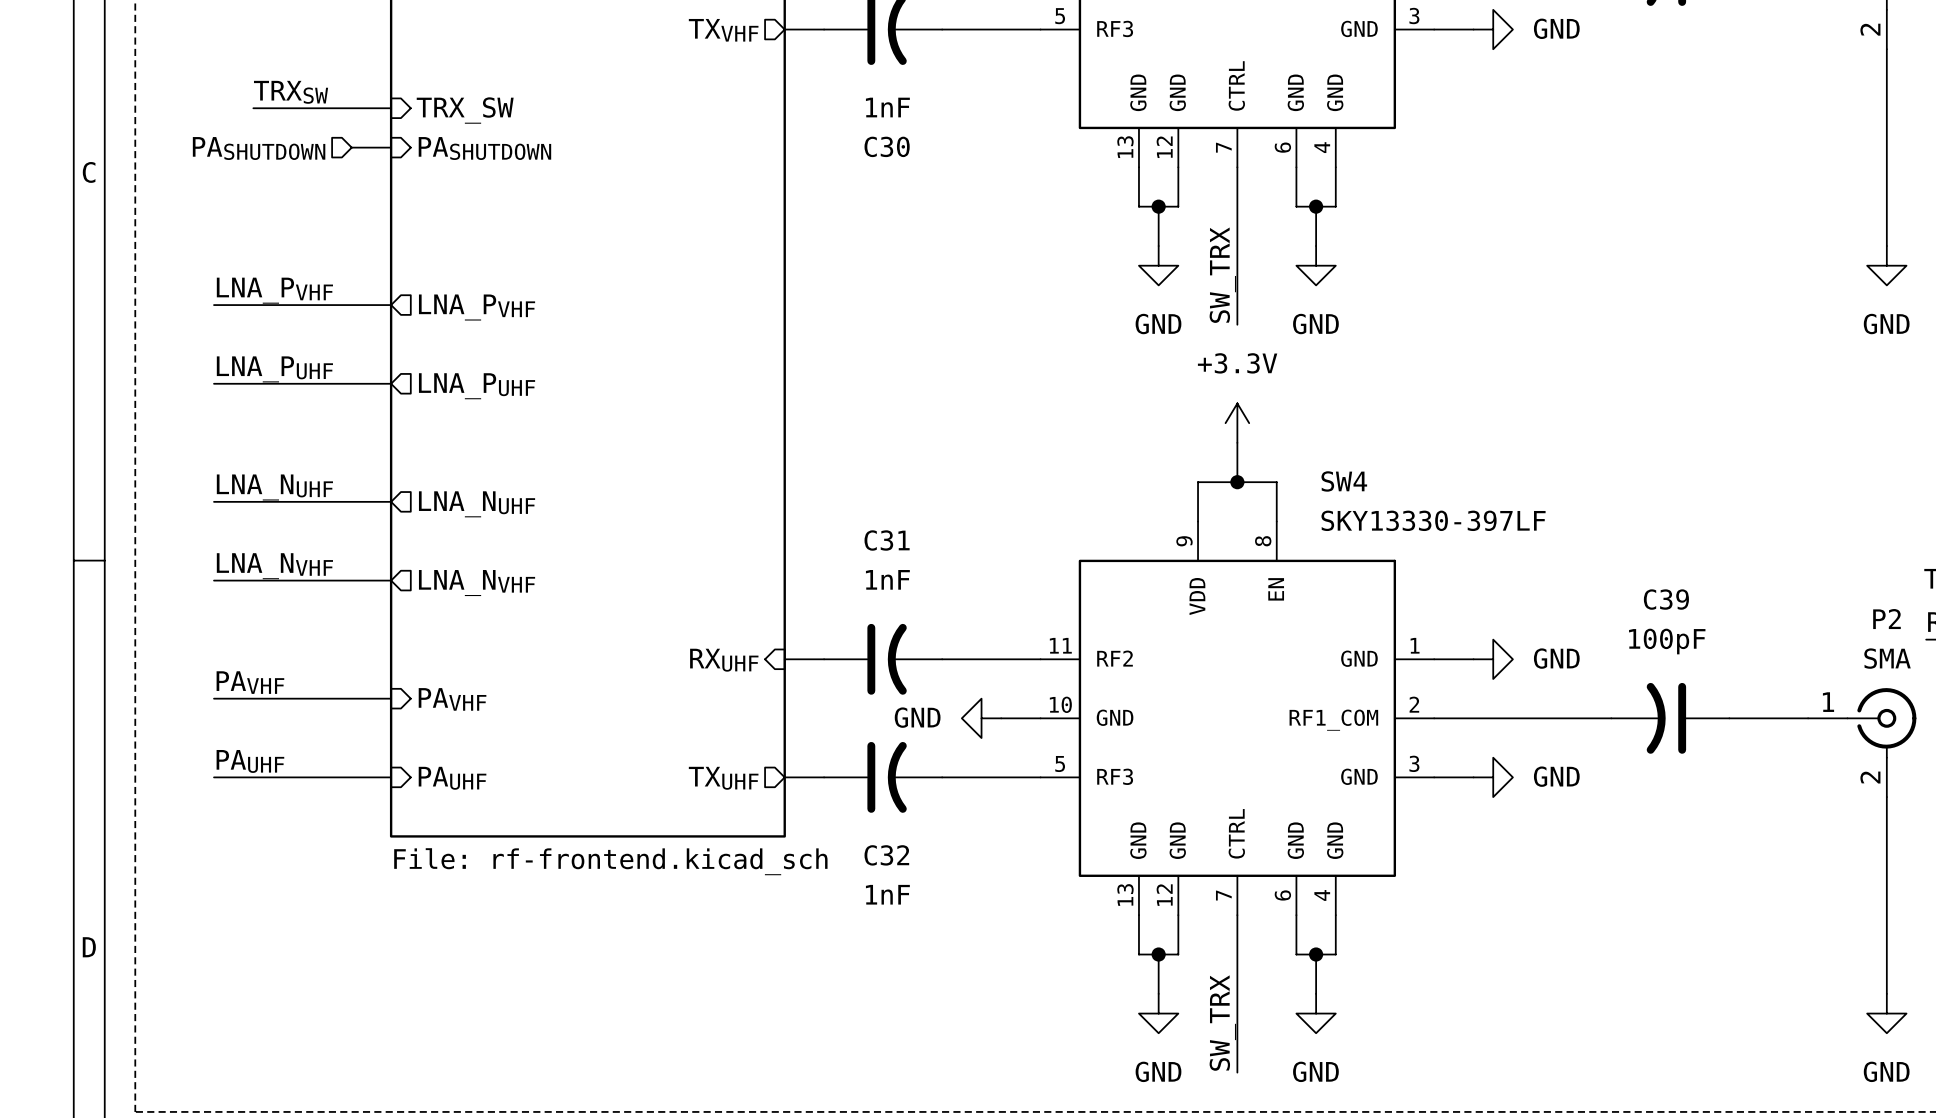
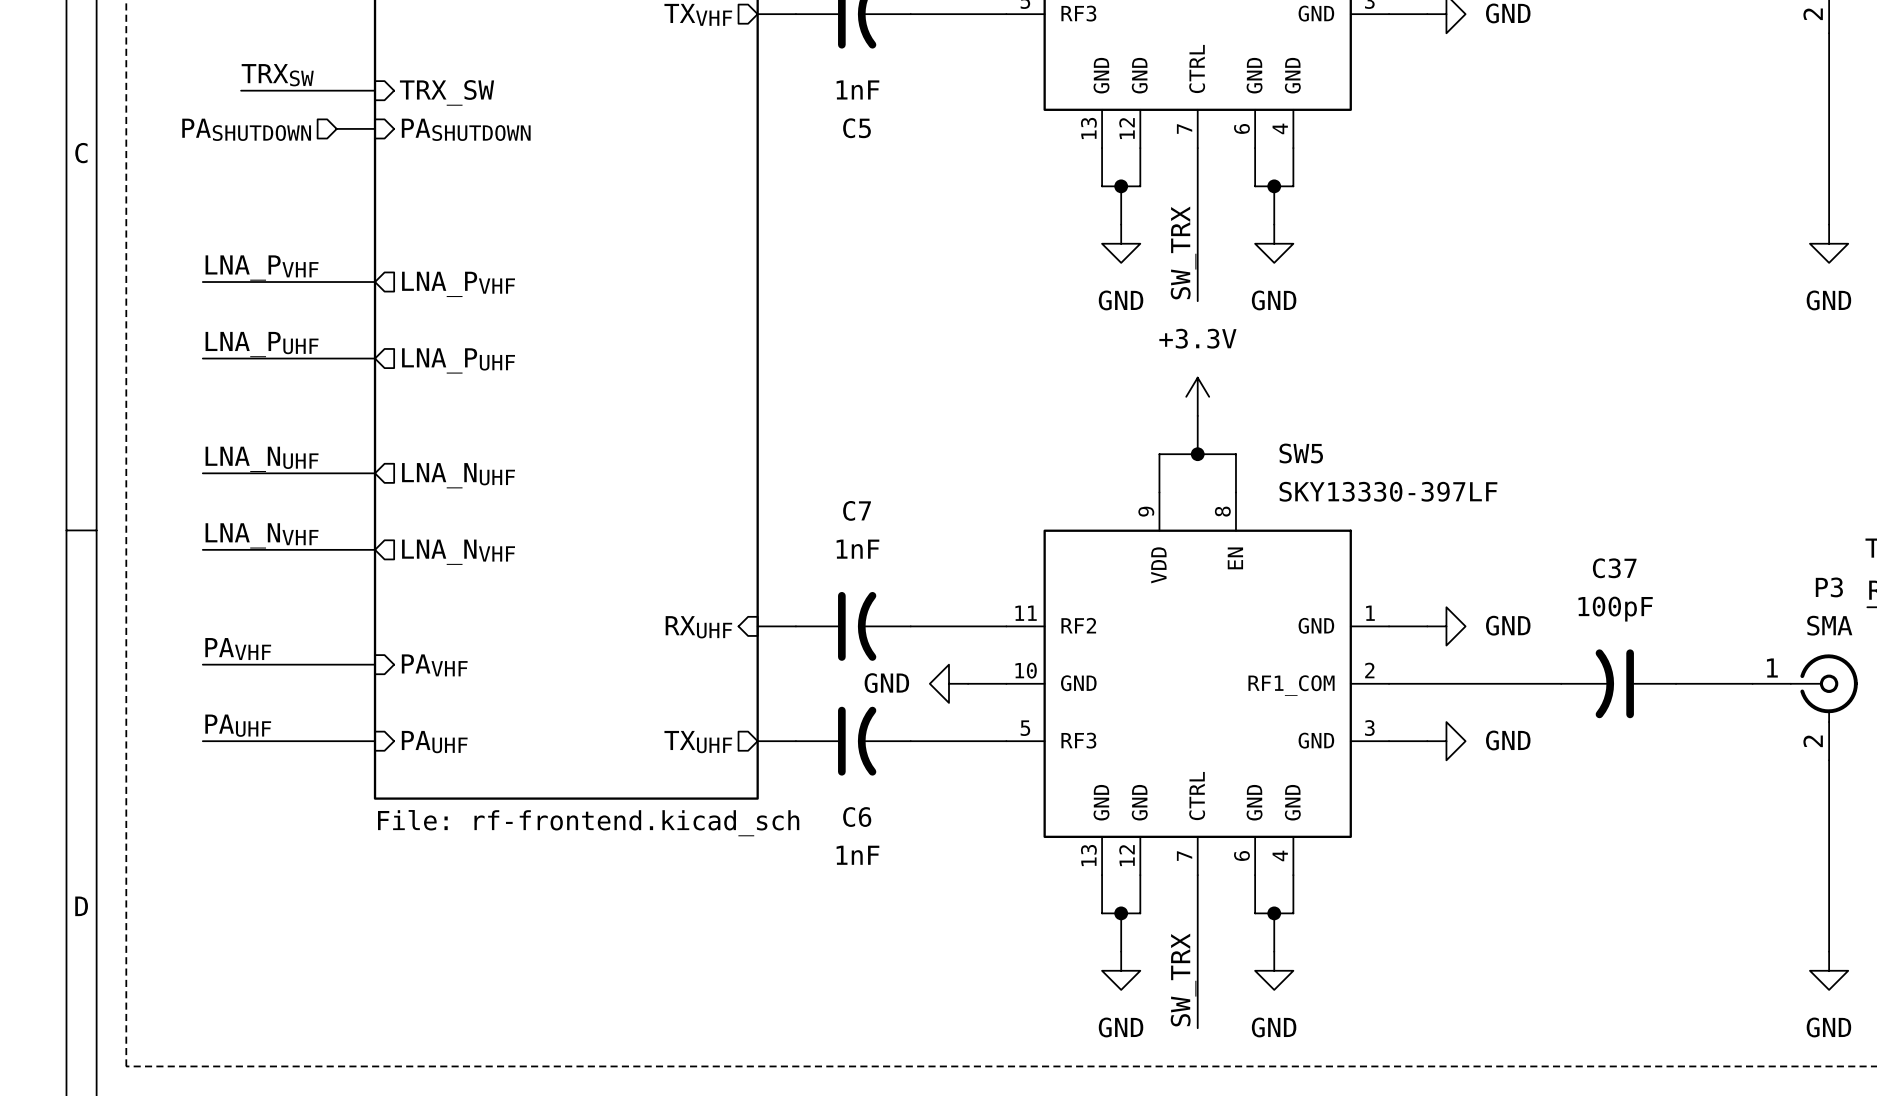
C30 name: C30 (887, 146) -> C5 (857, 128)
SW4 name: SW4 (1344, 481) -> SW5 (1301, 453)
C31 name: C31 (887, 540) -> C7 (857, 510)
C39 name: C39 (1666, 599) -> C37 (1614, 568)
P2 name: P2 (1886, 619) -> P3 (1829, 587)
C32 name: C32 (886, 855) -> C6 (857, 817)

